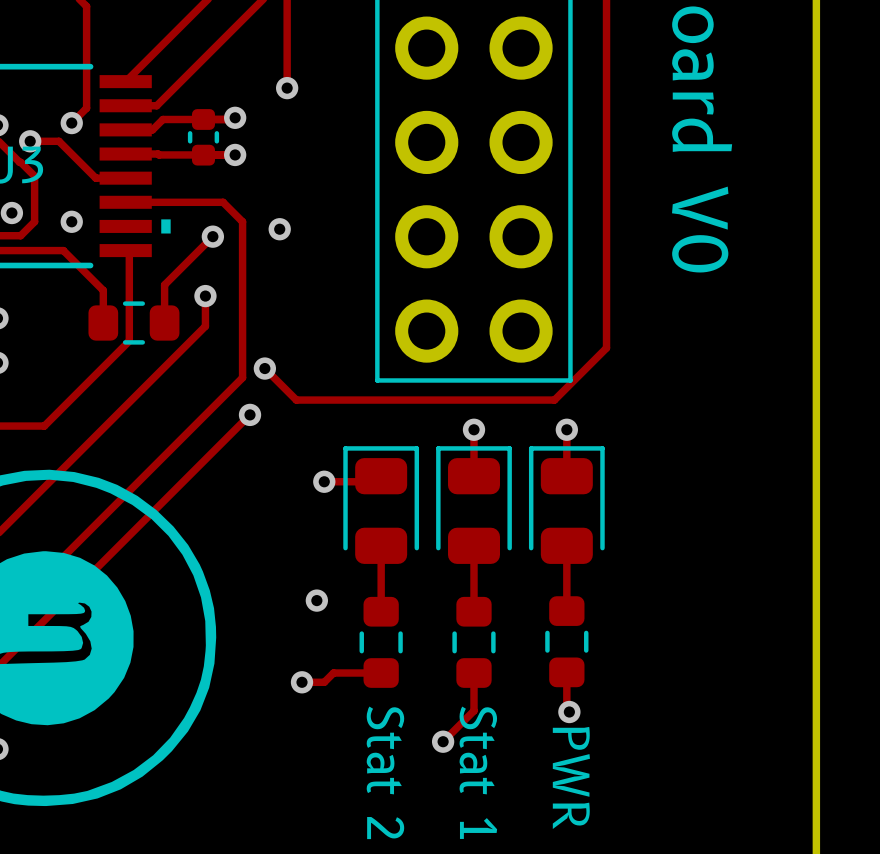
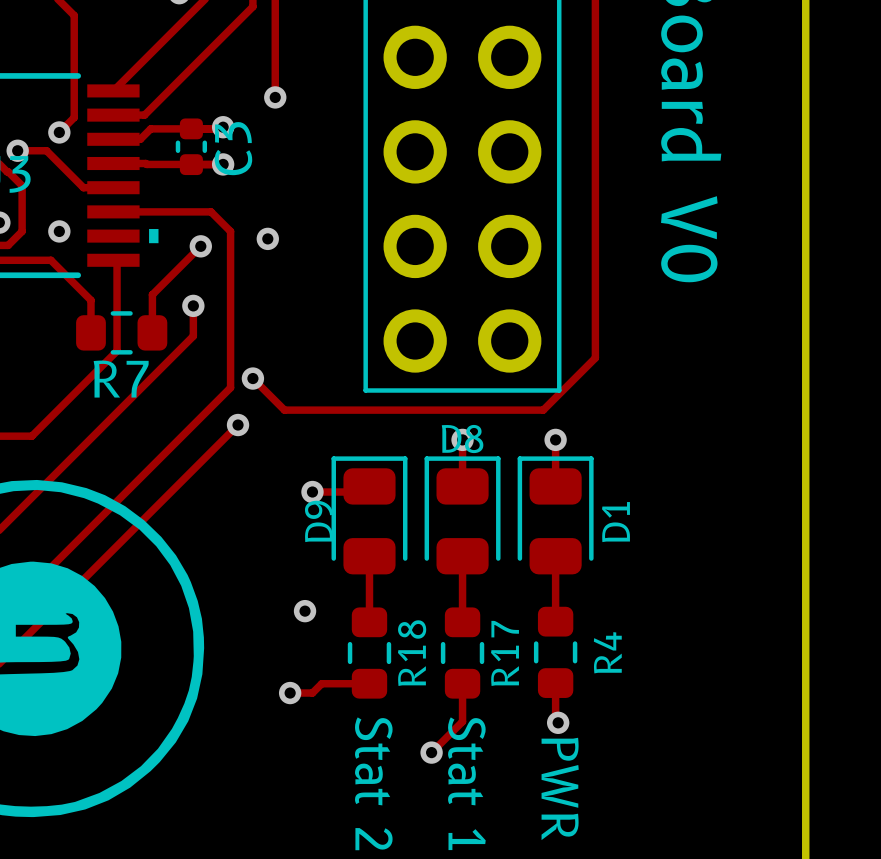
C3 name: none -> C3 (233, 148)
R7 name: none -> R7 (121, 379)
D8 name: none -> D8 (462, 439)
D9 name: none -> D9 (319, 521)
D1 name: none -> D1 (615, 522)
R18 name: none -> R18 (412, 653)
R17 name: none -> R17 (505, 653)
R4 name: none -> R4 (607, 652)

